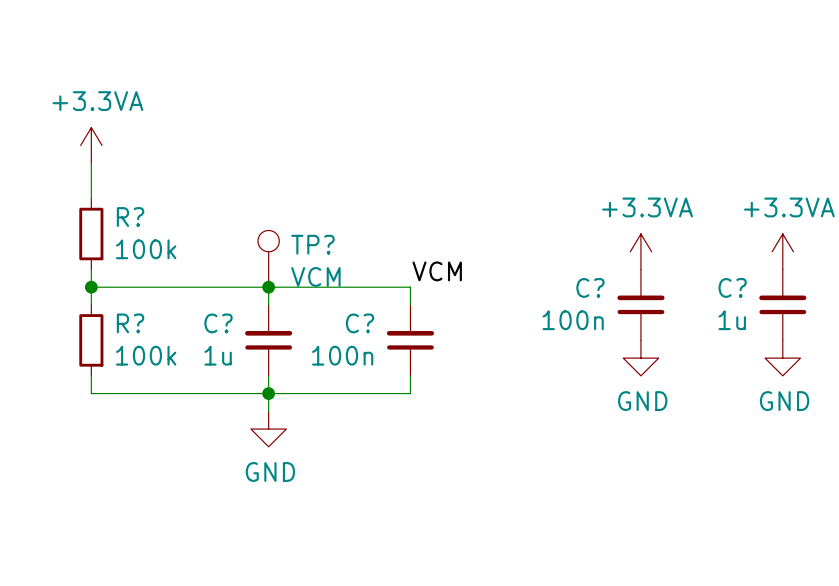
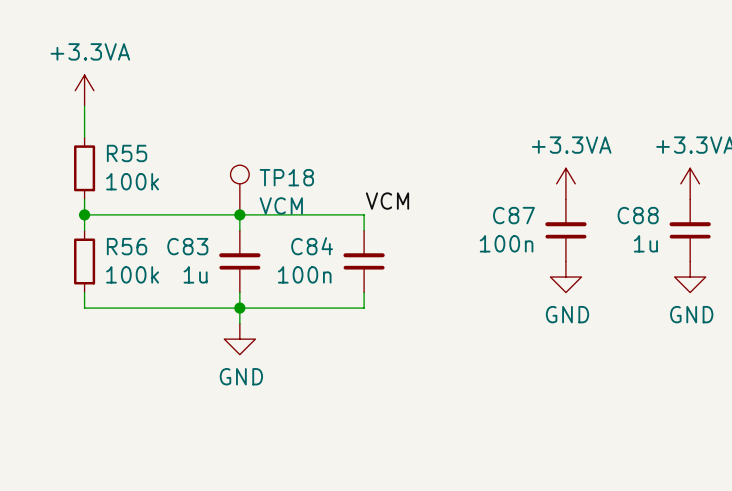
R? name: R? (130, 217) -> R55 (127, 153)
TP? name: TP? (312, 244) -> TP18 (286, 177)
C? name: C? (590, 287) -> C87 (513, 215)
C? name: C? (732, 287) -> C88 (638, 215)
R? name: R? (130, 323) -> R56 (127, 246)
C? name: C? (218, 323) -> C83 (187, 246)
C? name: C? (359, 323) -> C84 (312, 246)

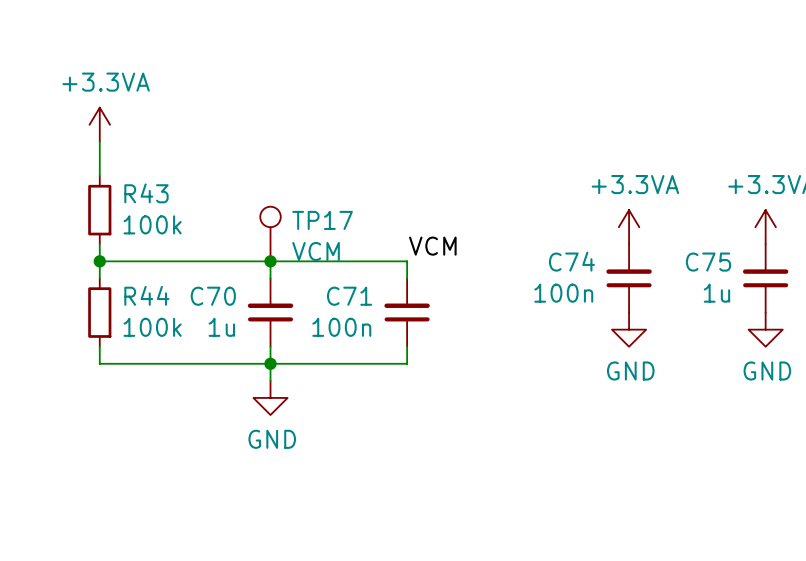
R55 name: R55 (127, 153) -> R43 (146, 193)
TP18 name: TP18 (286, 177) -> TP17 (322, 220)
C87 name: C87 (513, 215) -> C74 (571, 261)
C88 name: C88 (638, 215) -> C75 (708, 262)
R56 name: R56 (127, 246) -> R44 (146, 295)
C83 name: C83 (187, 246) -> C70 (213, 296)
C84 name: C84 (312, 246) -> C71 (349, 296)

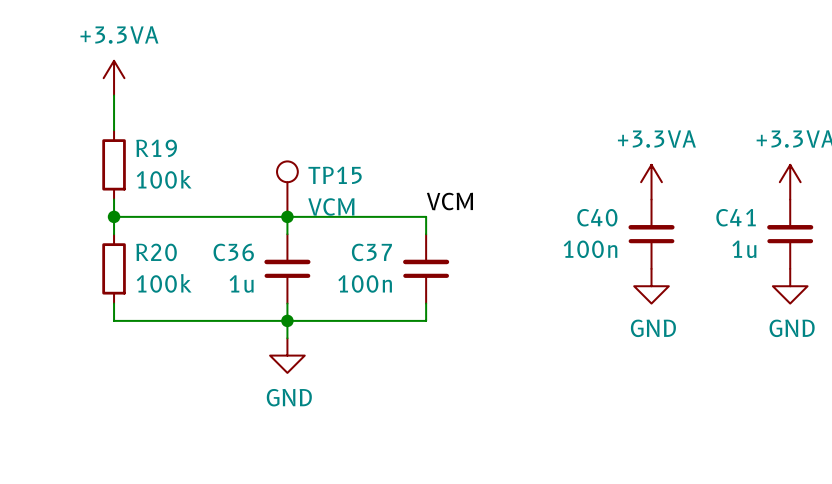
R43 name: R43 (146, 193) -> R19 (156, 148)
TP17 name: TP17 (322, 220) -> TP15 (335, 175)
C74 name: C74 (571, 261) -> C40 (597, 217)
C75 name: C75 (708, 262) -> C41 (736, 217)
R44 name: R44 (146, 295) -> R20 (156, 252)
C70 name: C70 (213, 296) -> C36 (233, 252)
C71 name: C71 (349, 296) -> C37 (371, 252)

